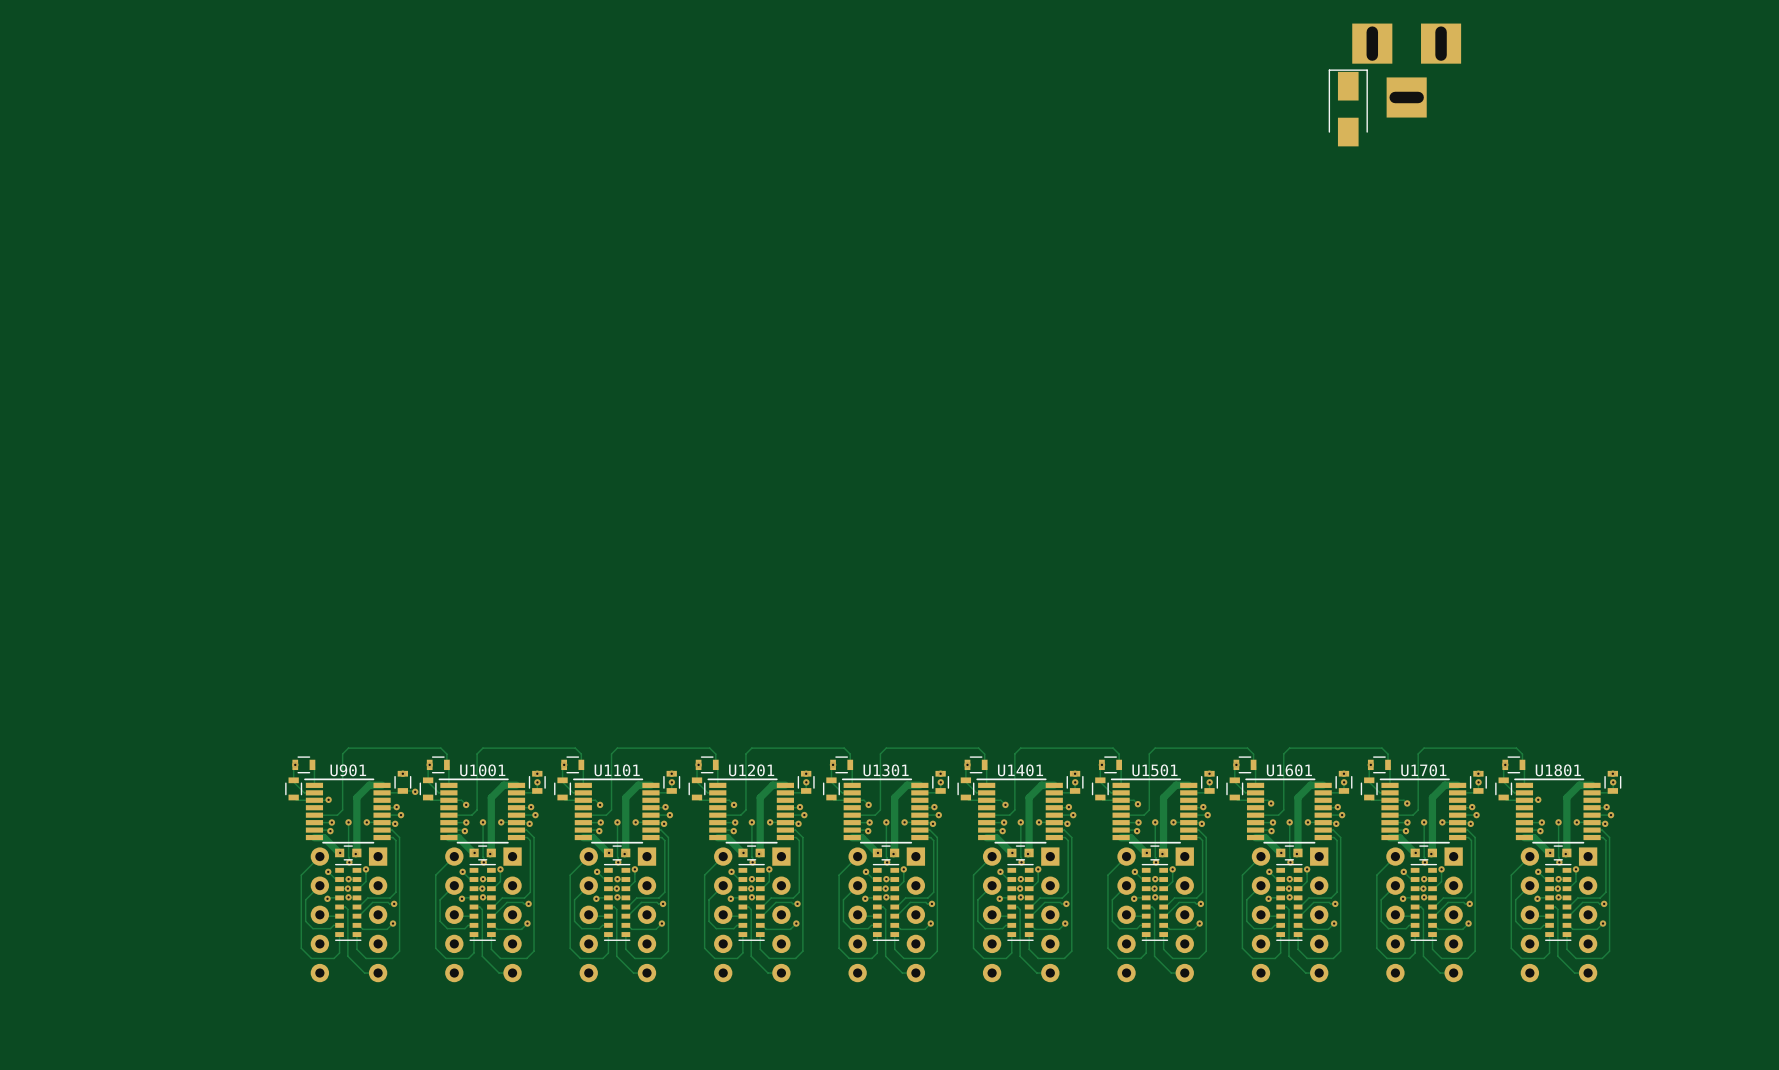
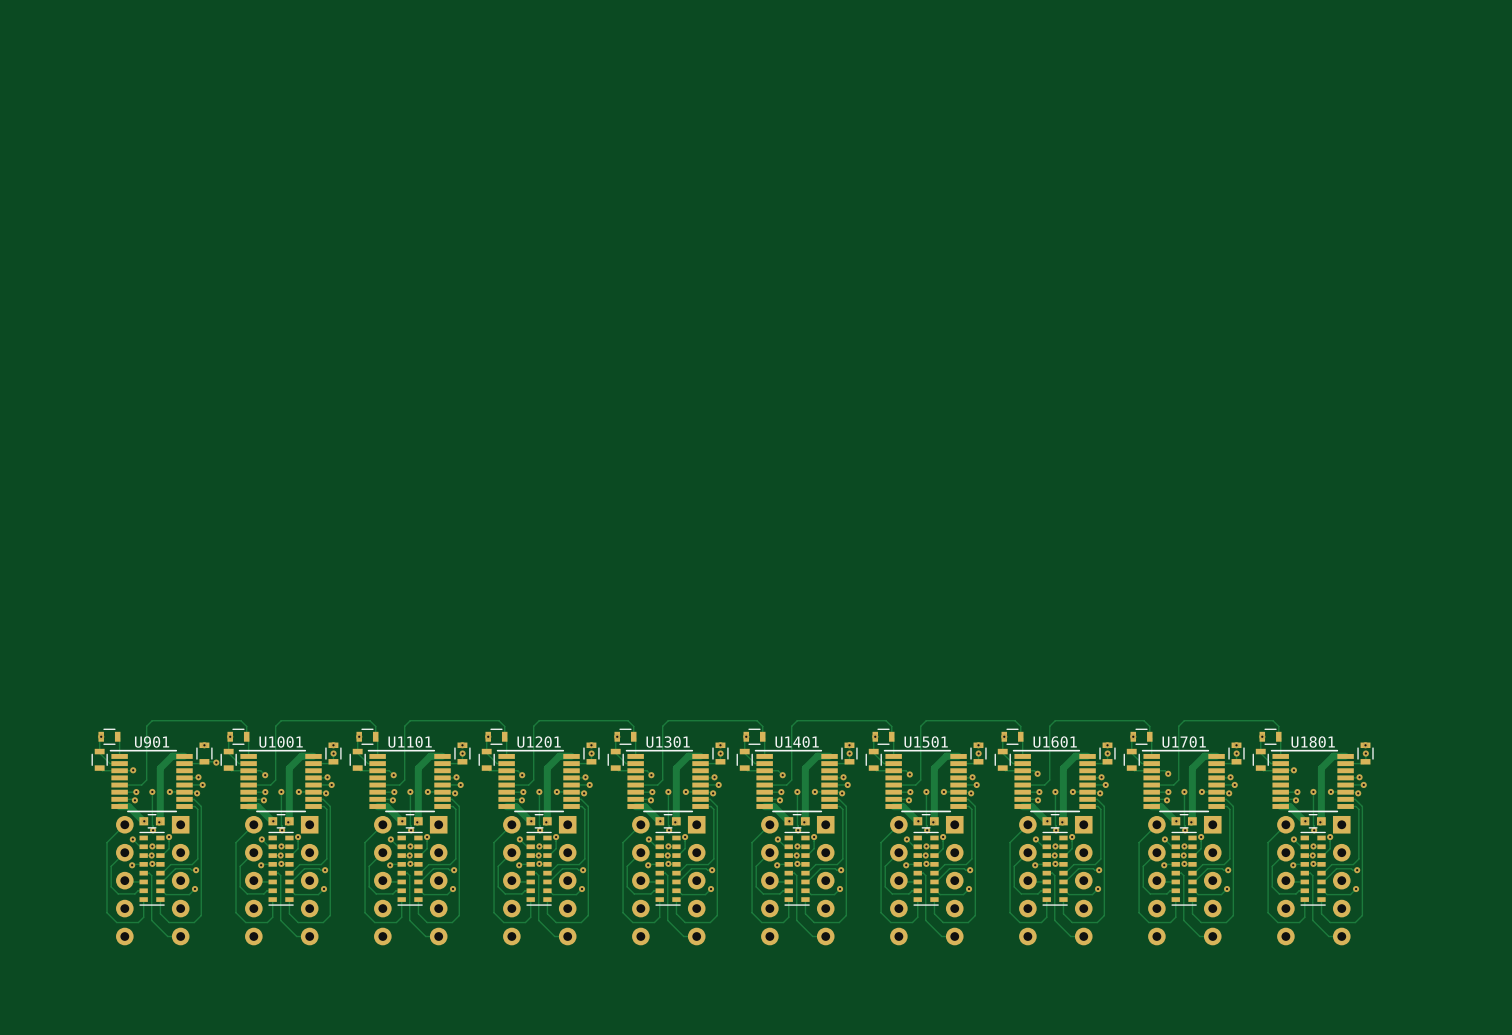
part: (1406, 70) -> none
part: (1348, 107) -> none

